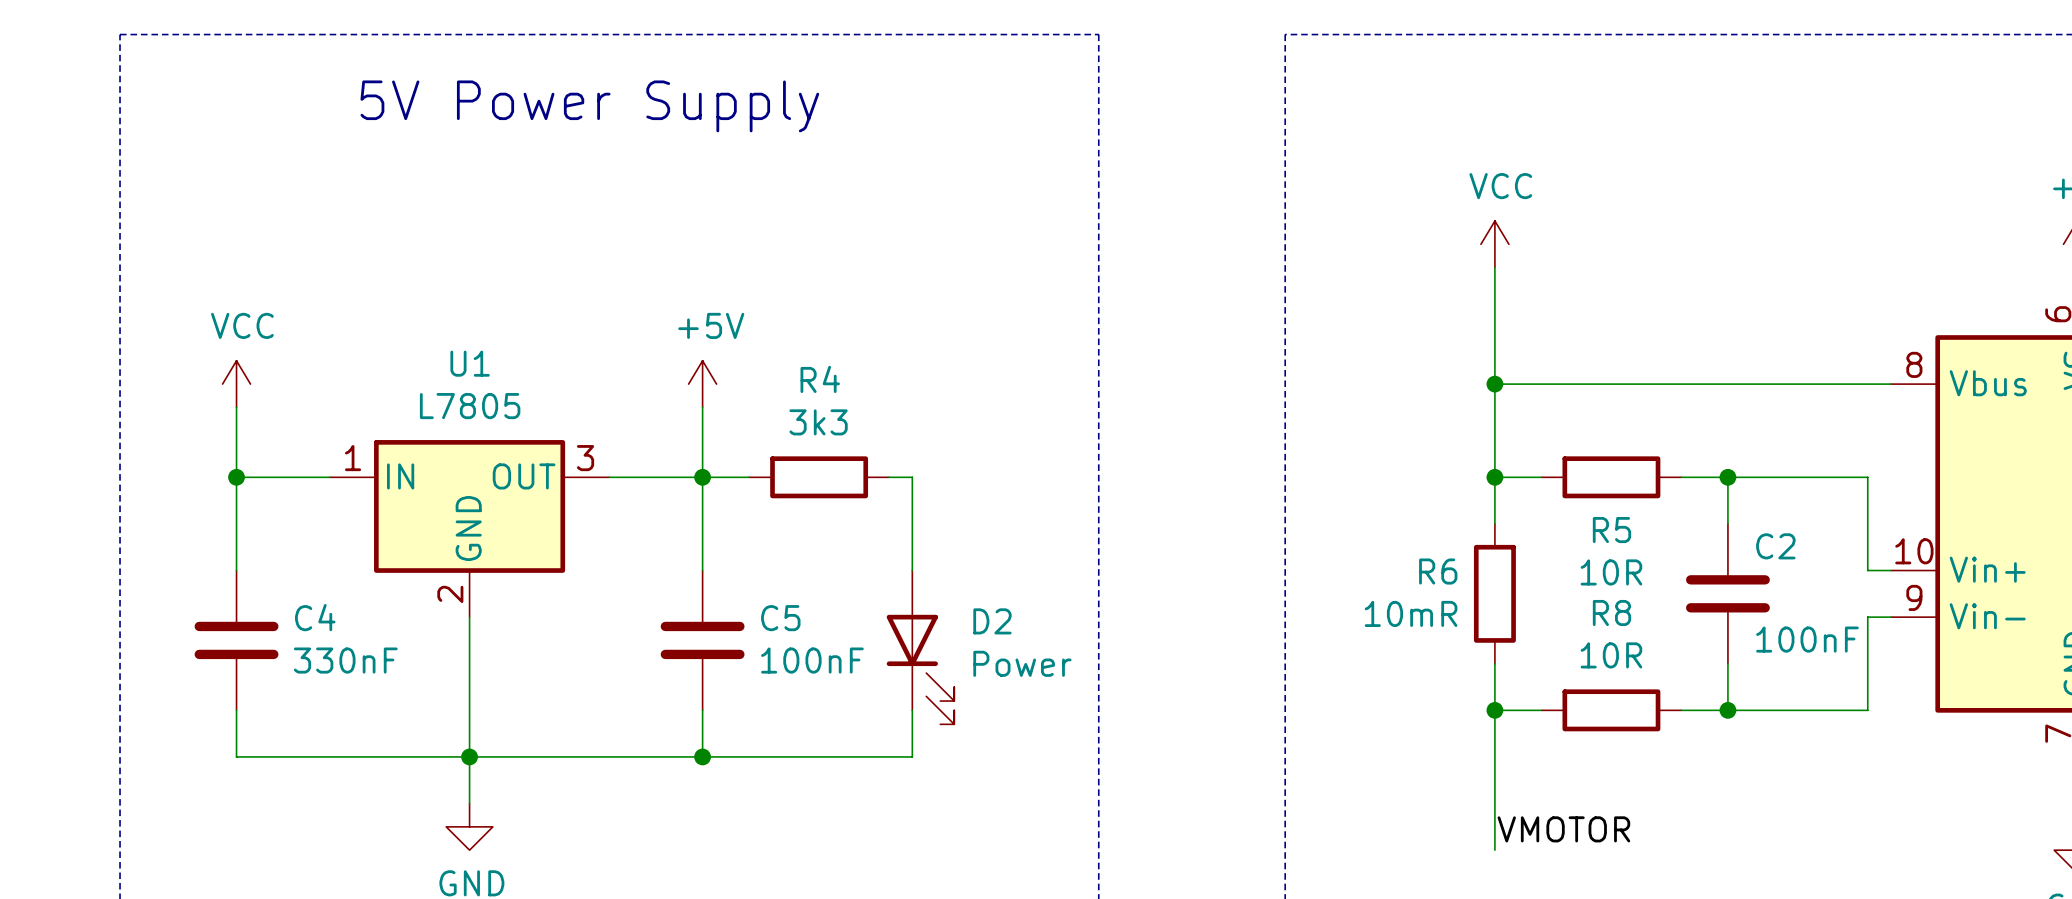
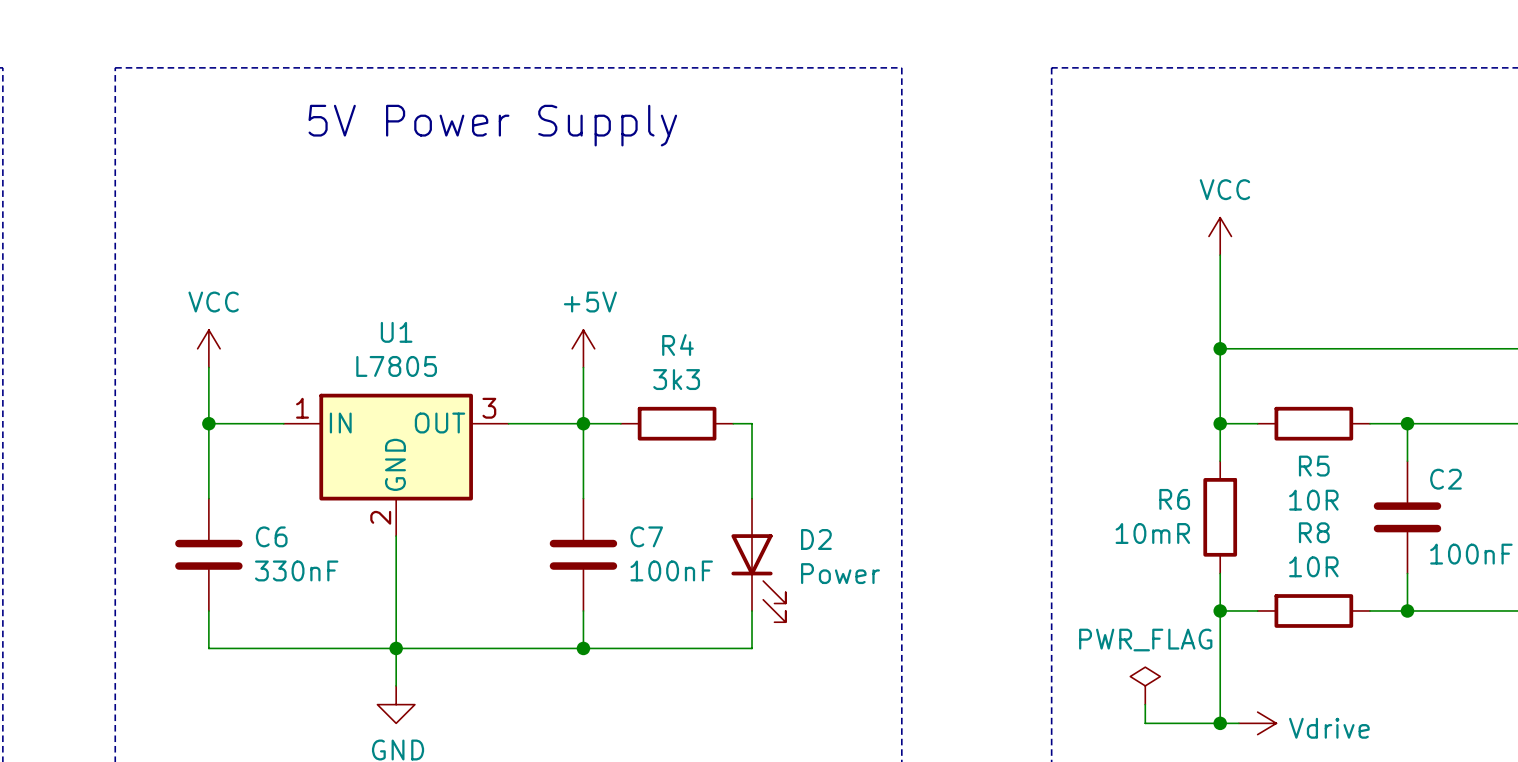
C4 name: C4 (315, 617) -> C6 (271, 536)
C5 name: C5 (780, 618) -> C7 (646, 536)
power symbol: none -> PWR_FLAG (1145, 685)
wire: none -> (1145, 704) (1145, 723) (1238, 723)
label: VMOTOR (1563, 829) -> none
junction: none -> (1220, 723)
power symbol: none -> Vdrive (1257, 723)

